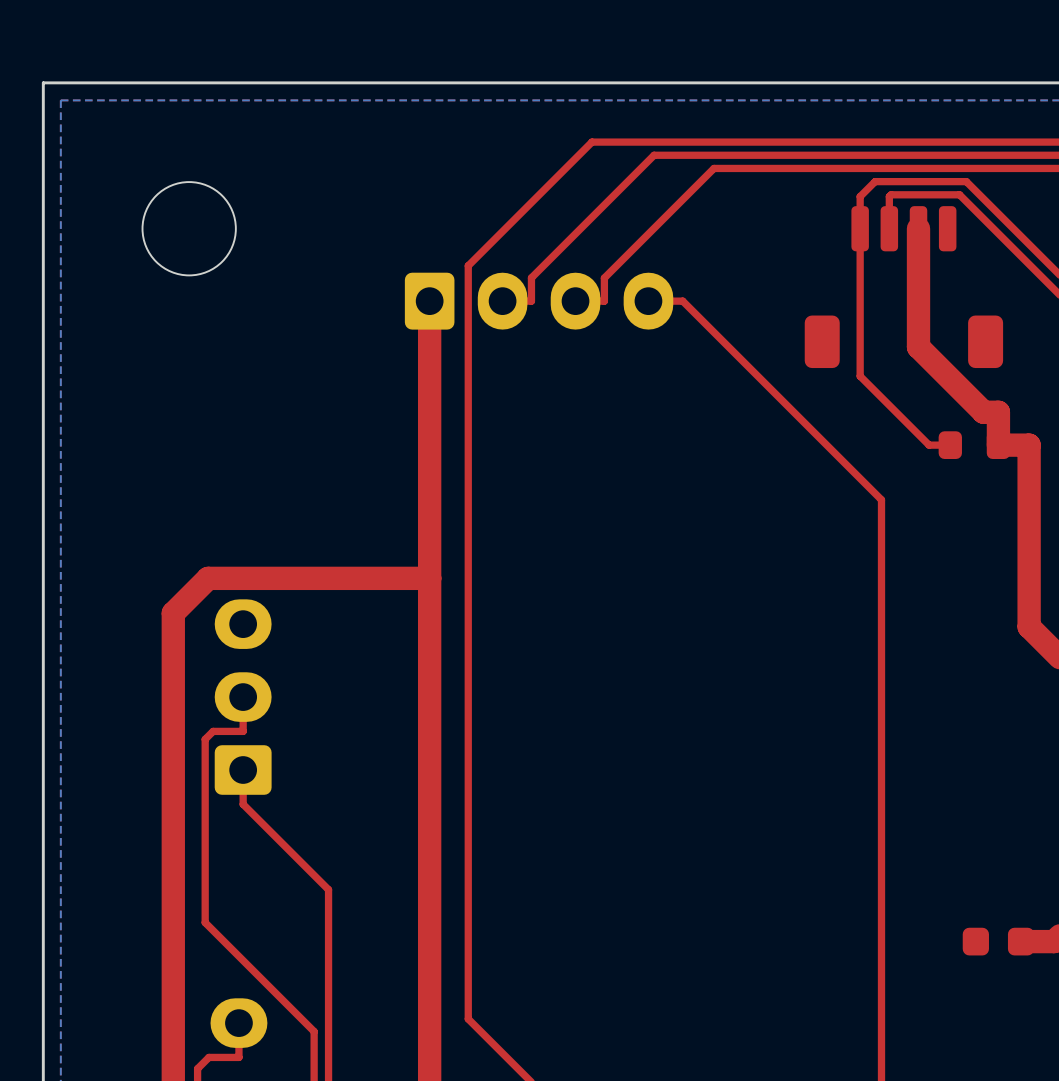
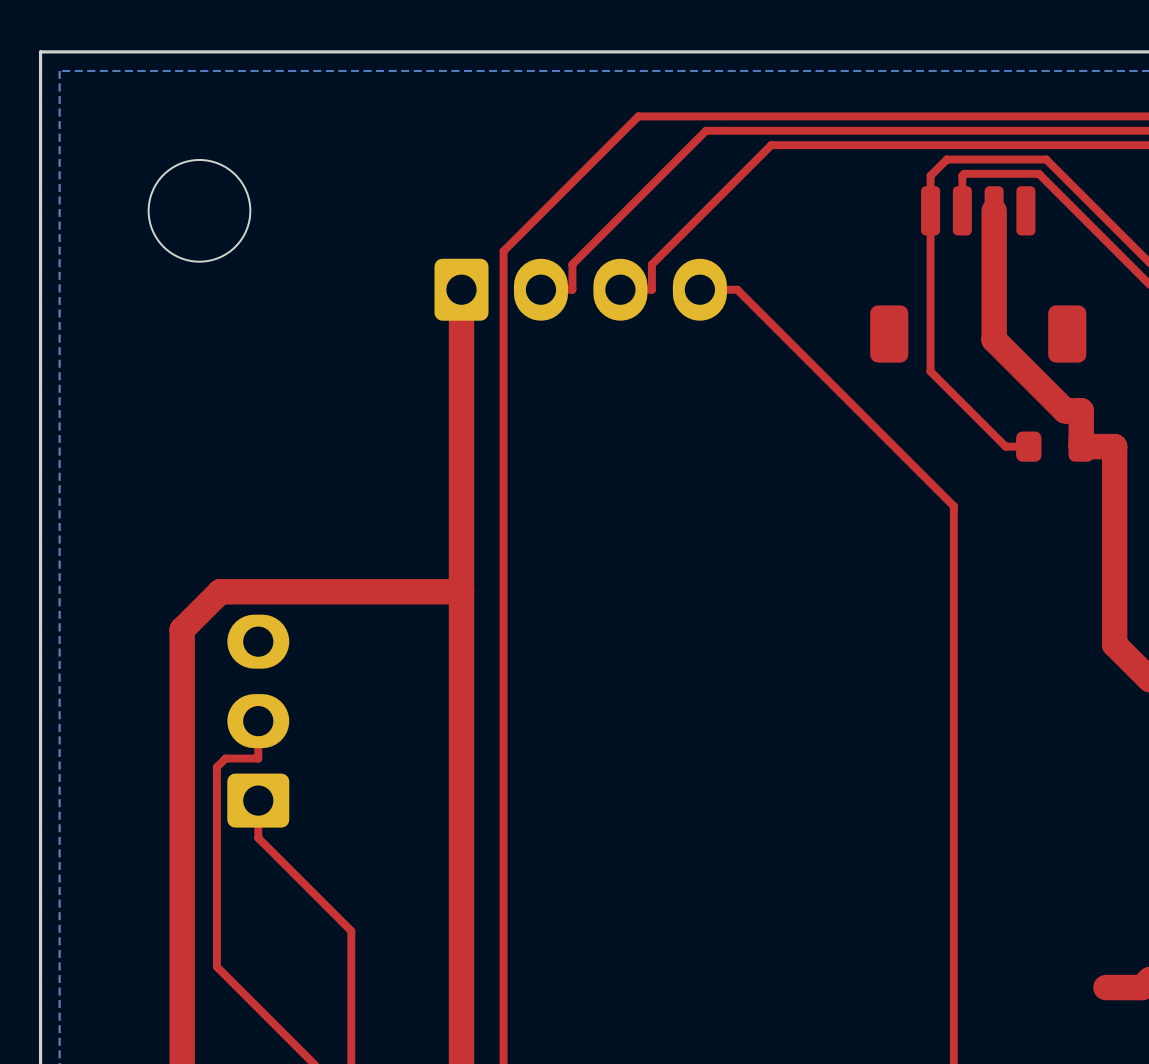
part: (998, 941) -> none

